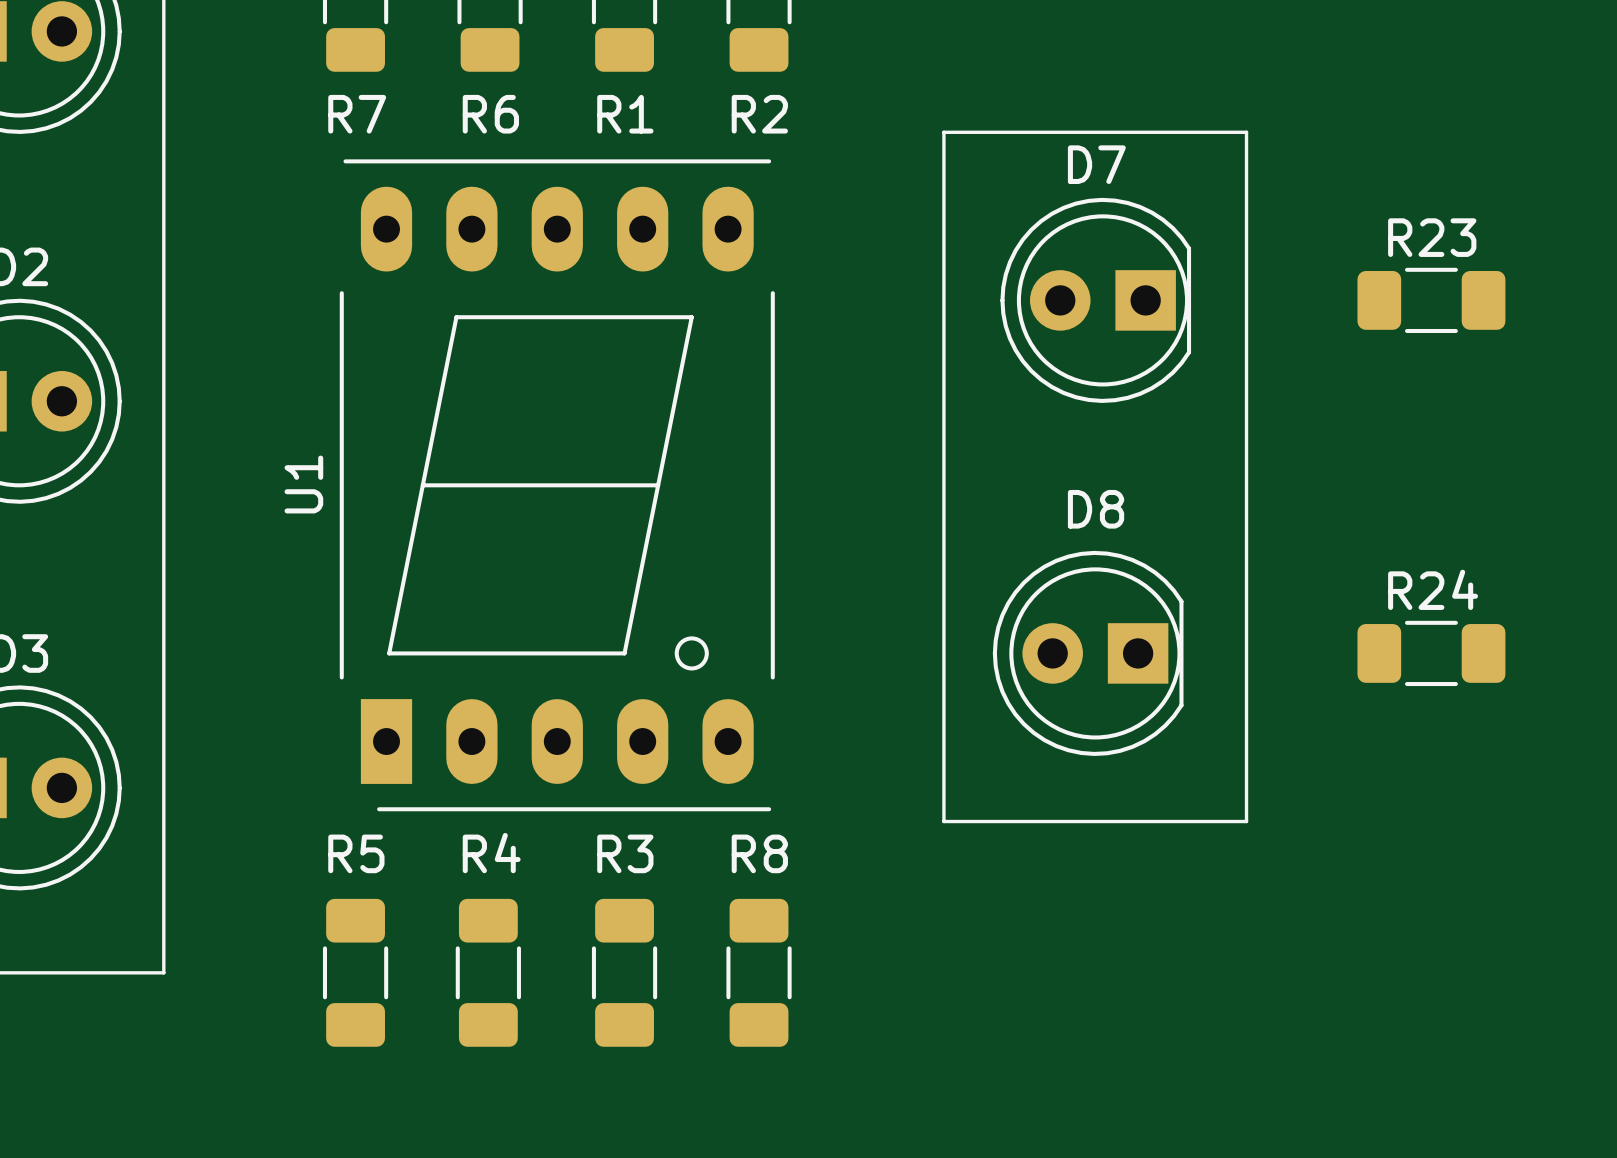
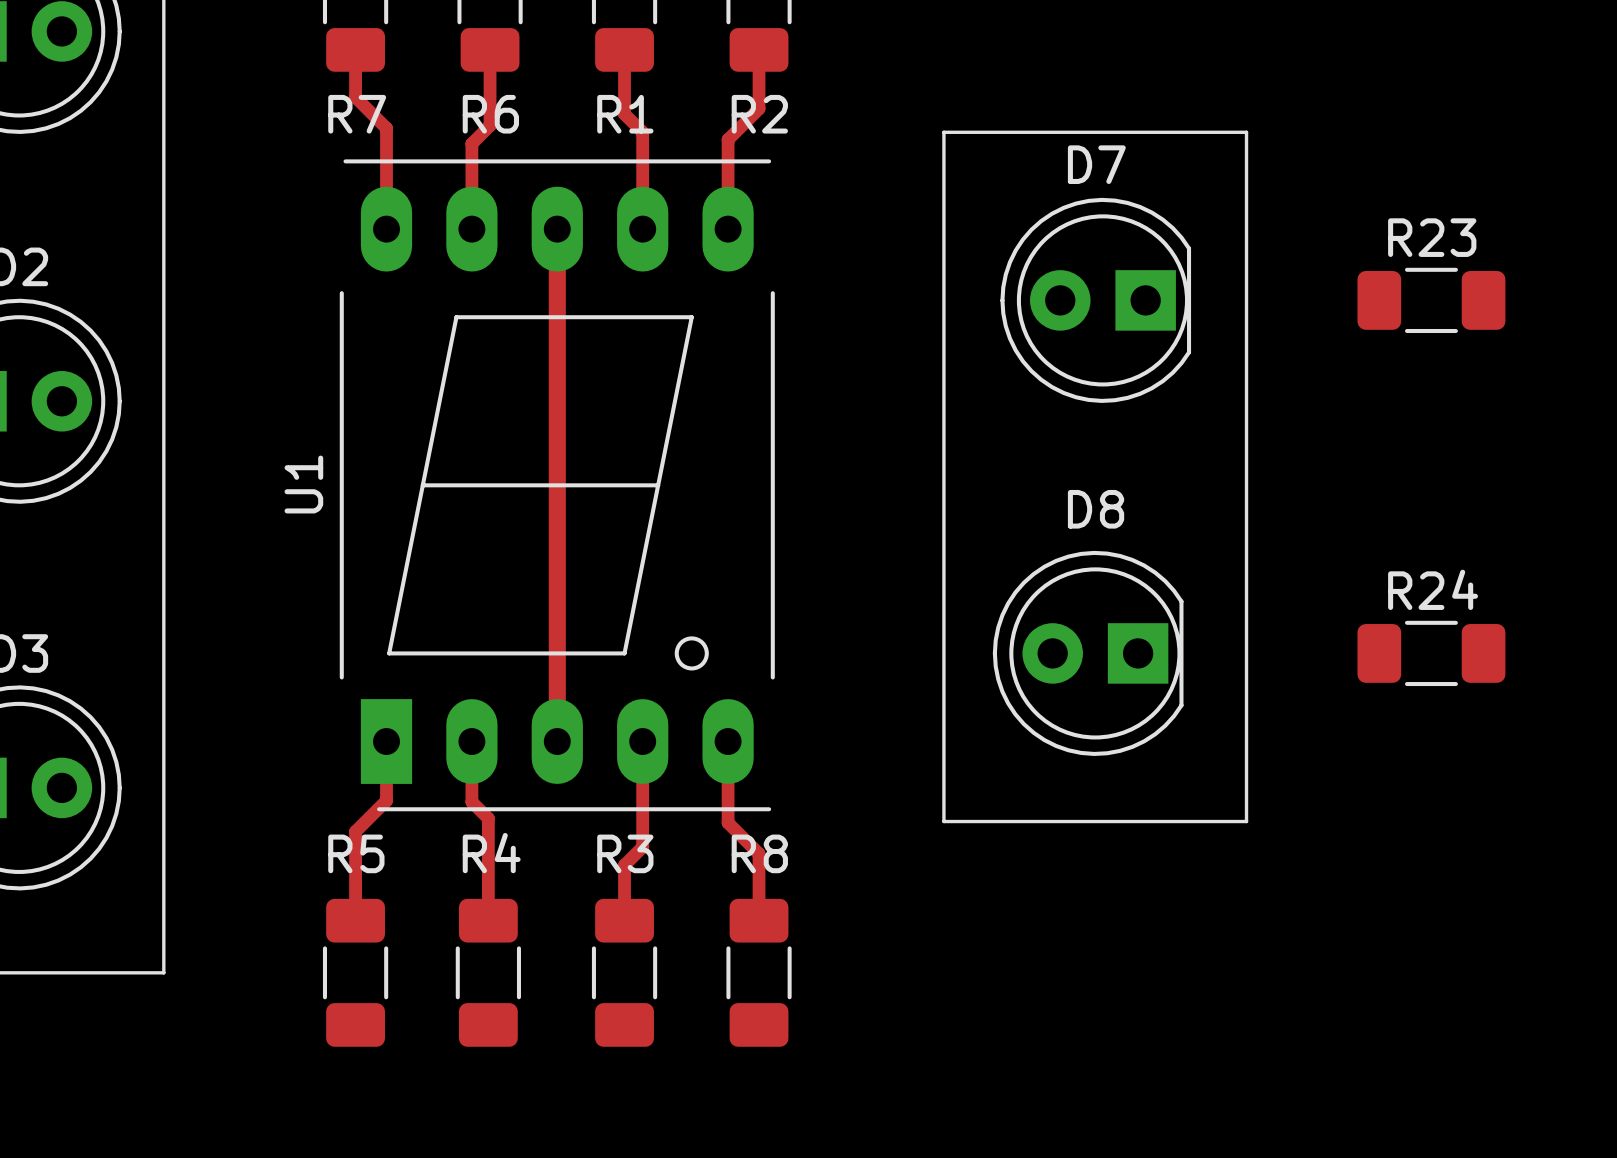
track: none -> (355, 49) (355, 97) (386, 128) (386, 229)
track: none -> (490, 49) (490, 125) (471, 143) (471, 229)
track: none -> (624, 49) (624, 114) (642, 132) (642, 229)
track: none -> (759, 49) (759, 108) (728, 139) (728, 229)
track: none -> (557, 229) (557, 741)
track: none -> (386, 741) (386, 800) (355, 831) (355, 920)
track: none -> (471, 741) (471, 802) (488, 818) (488, 920)
track: none -> (642, 741) (642, 847) (624, 865) (624, 920)
track: none -> (728, 741) (728, 822) (759, 853) (759, 920)

